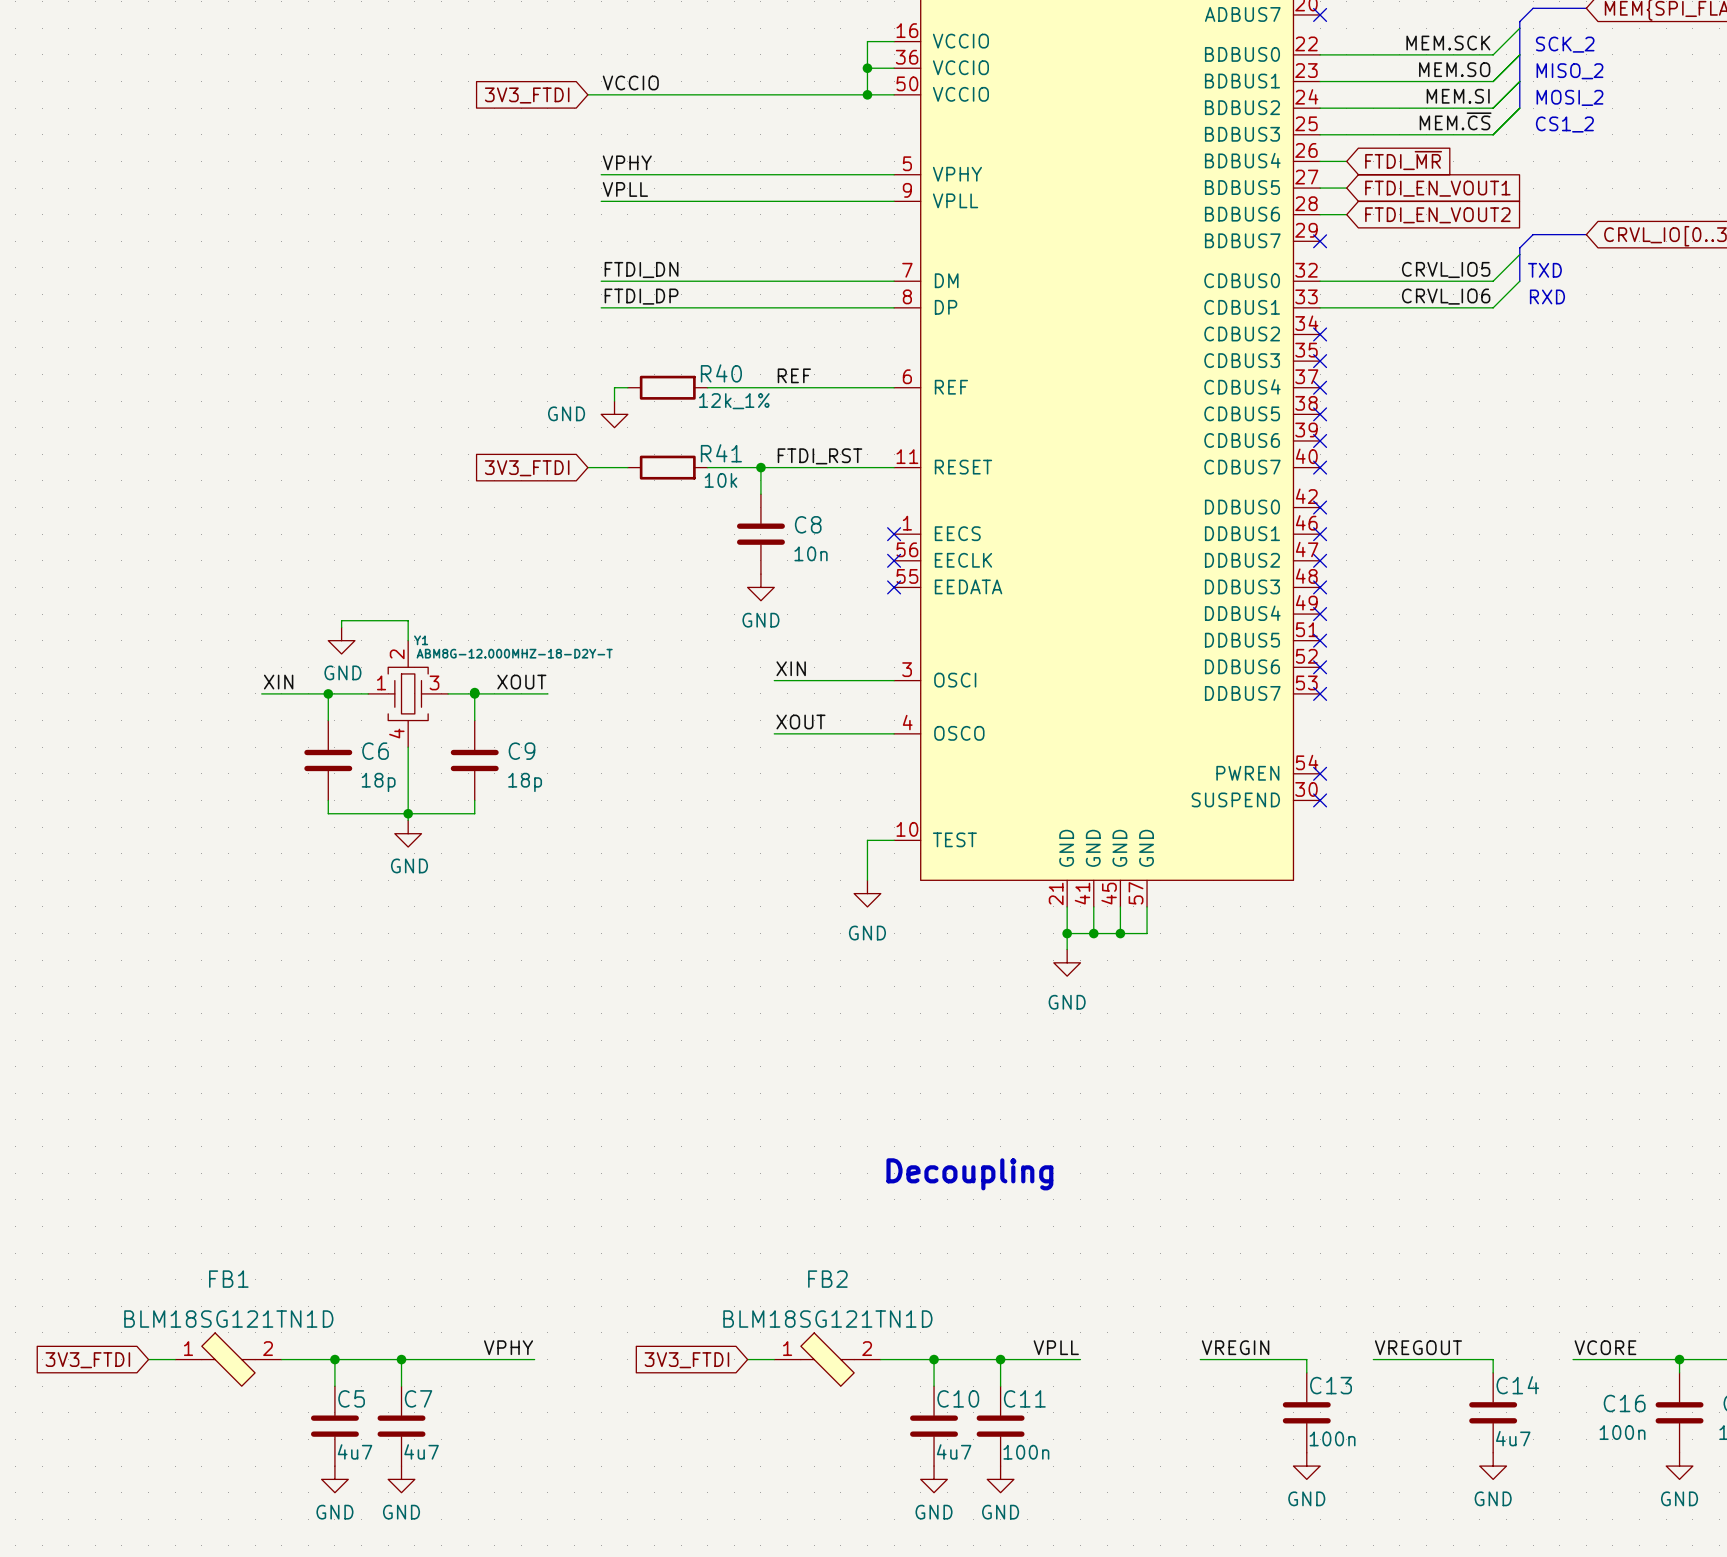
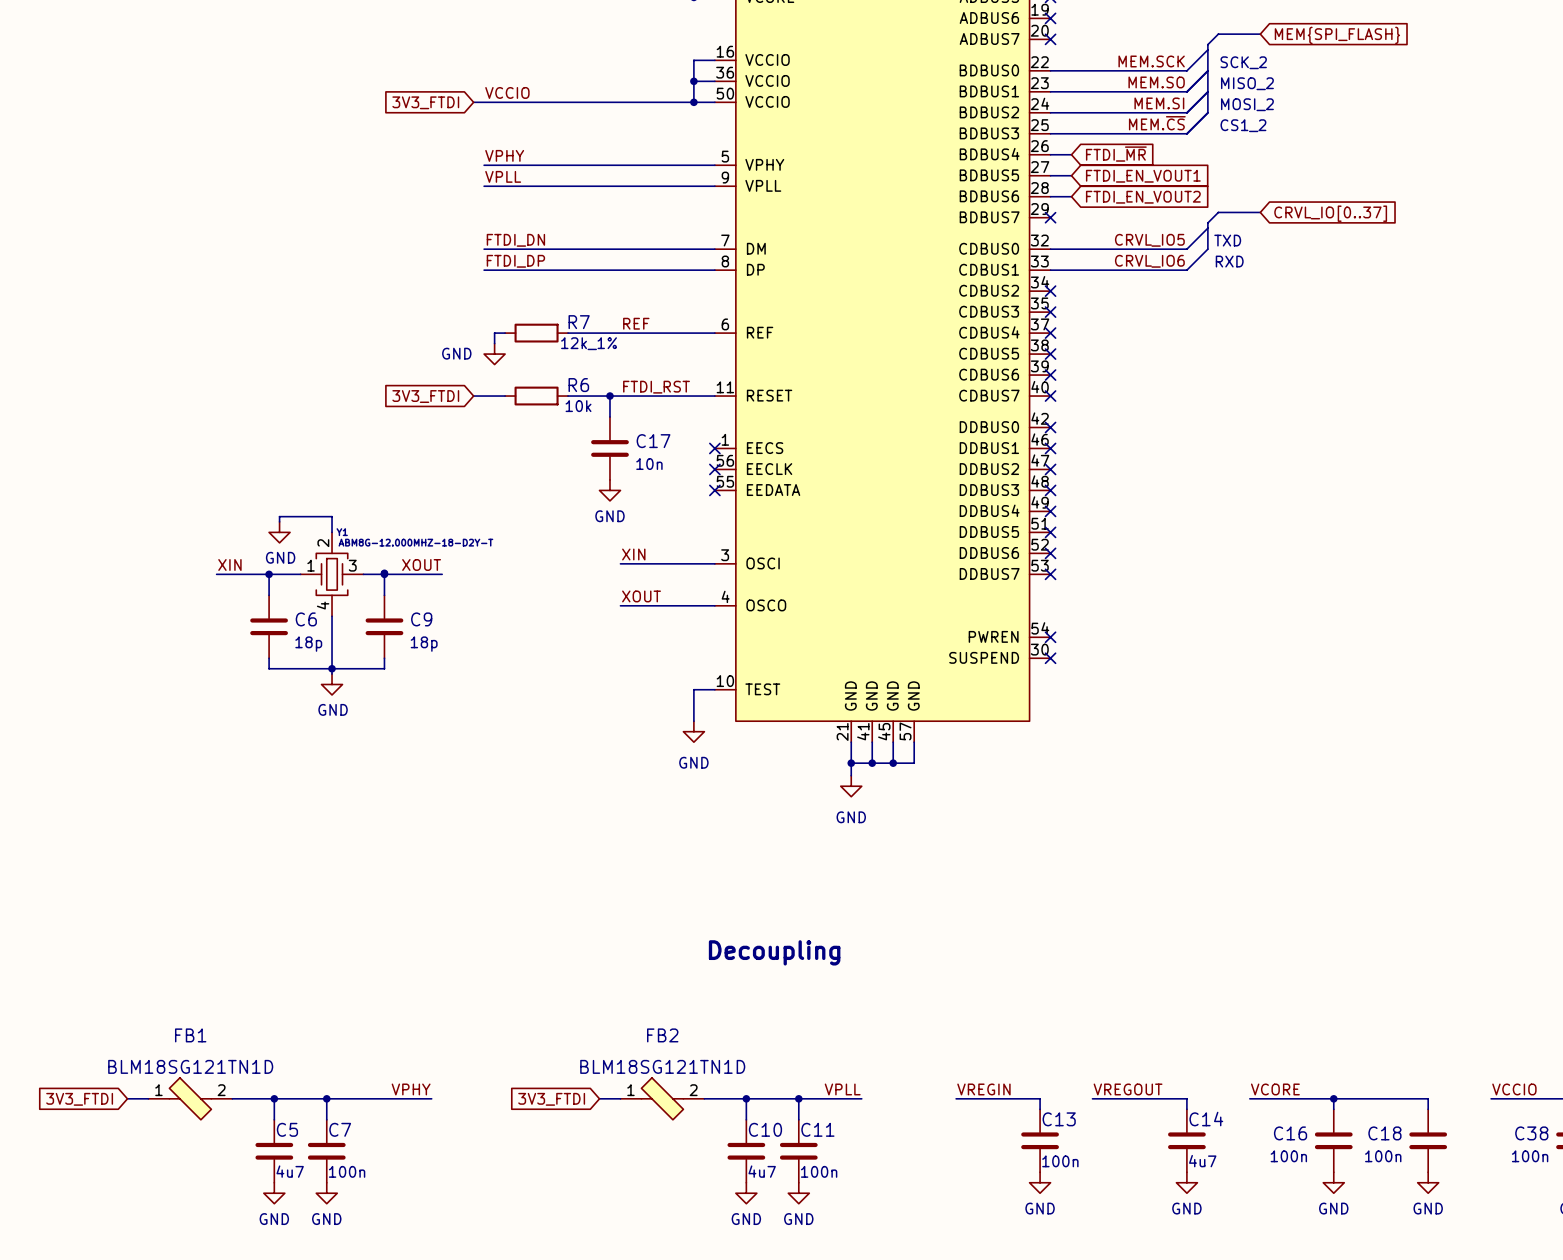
R40 name: R40 (721, 373) -> R7 (579, 322)
R41 name: R41 (721, 453) -> R6 (578, 385)
C8 name: C8 (808, 524) -> C17 (653, 441)
C7 text: 4u7 (421, 1451) -> 100n (347, 1171)

